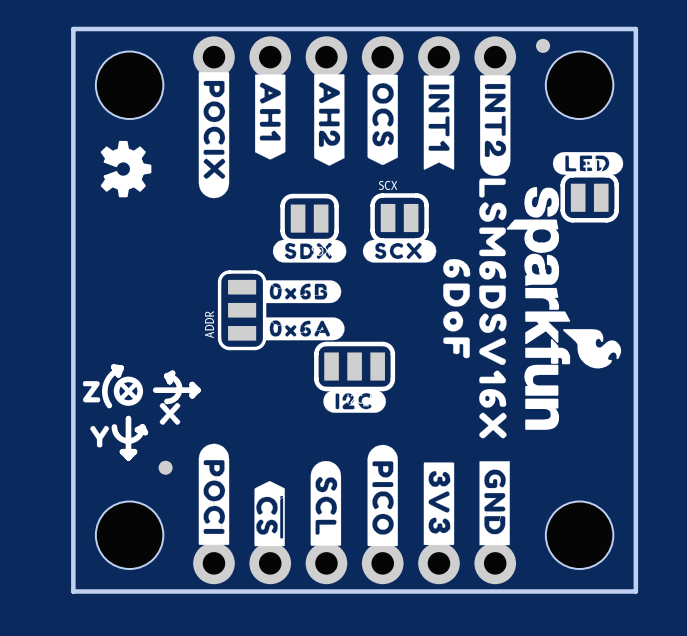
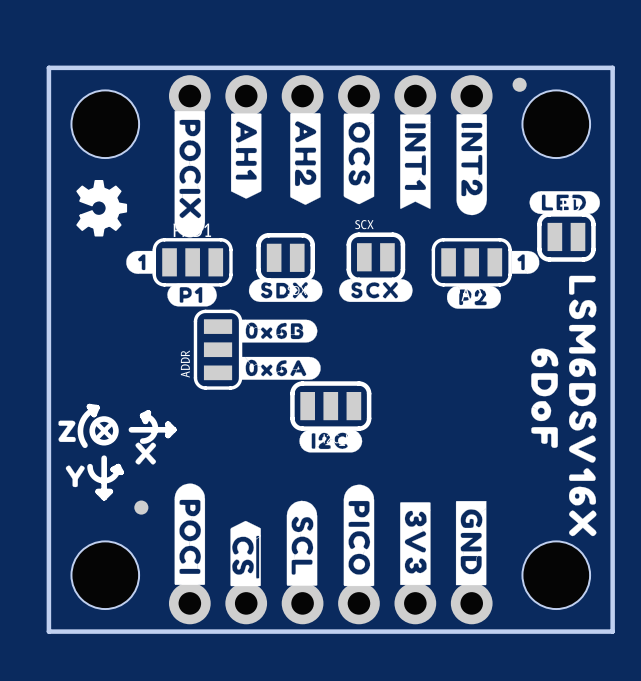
drawing: [506, 186, 622, 430] -> none
drawing: none -> [126, 250, 217, 307]
drawing: none -> [447, 250, 540, 309]
part: none -> (192, 262)
part: none -> (471, 262)
drawing position: (456, 308) -> (544, 398)
drawing position: (492, 308) -> (582, 406)

